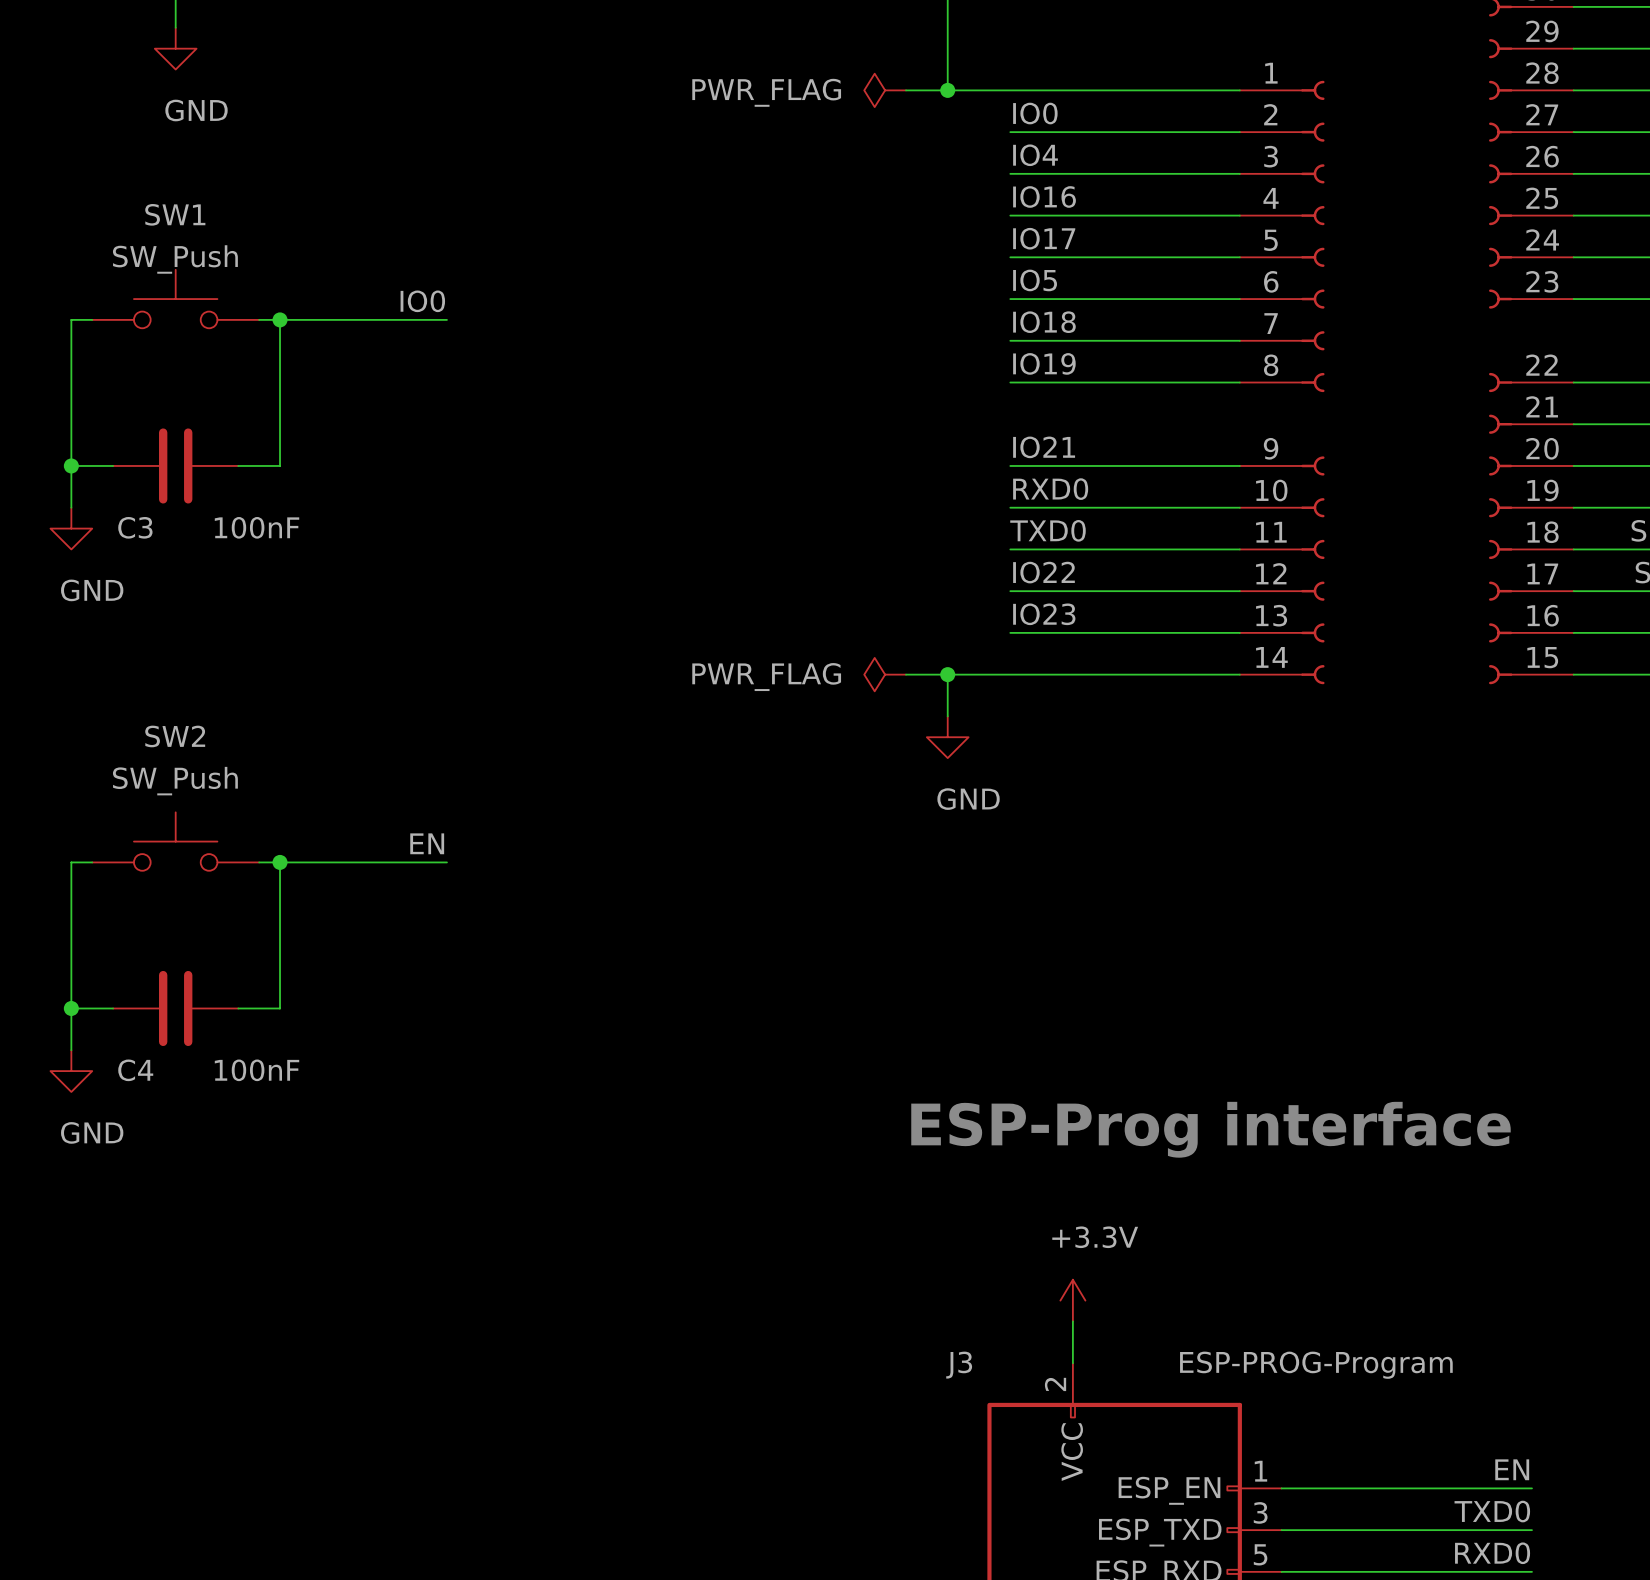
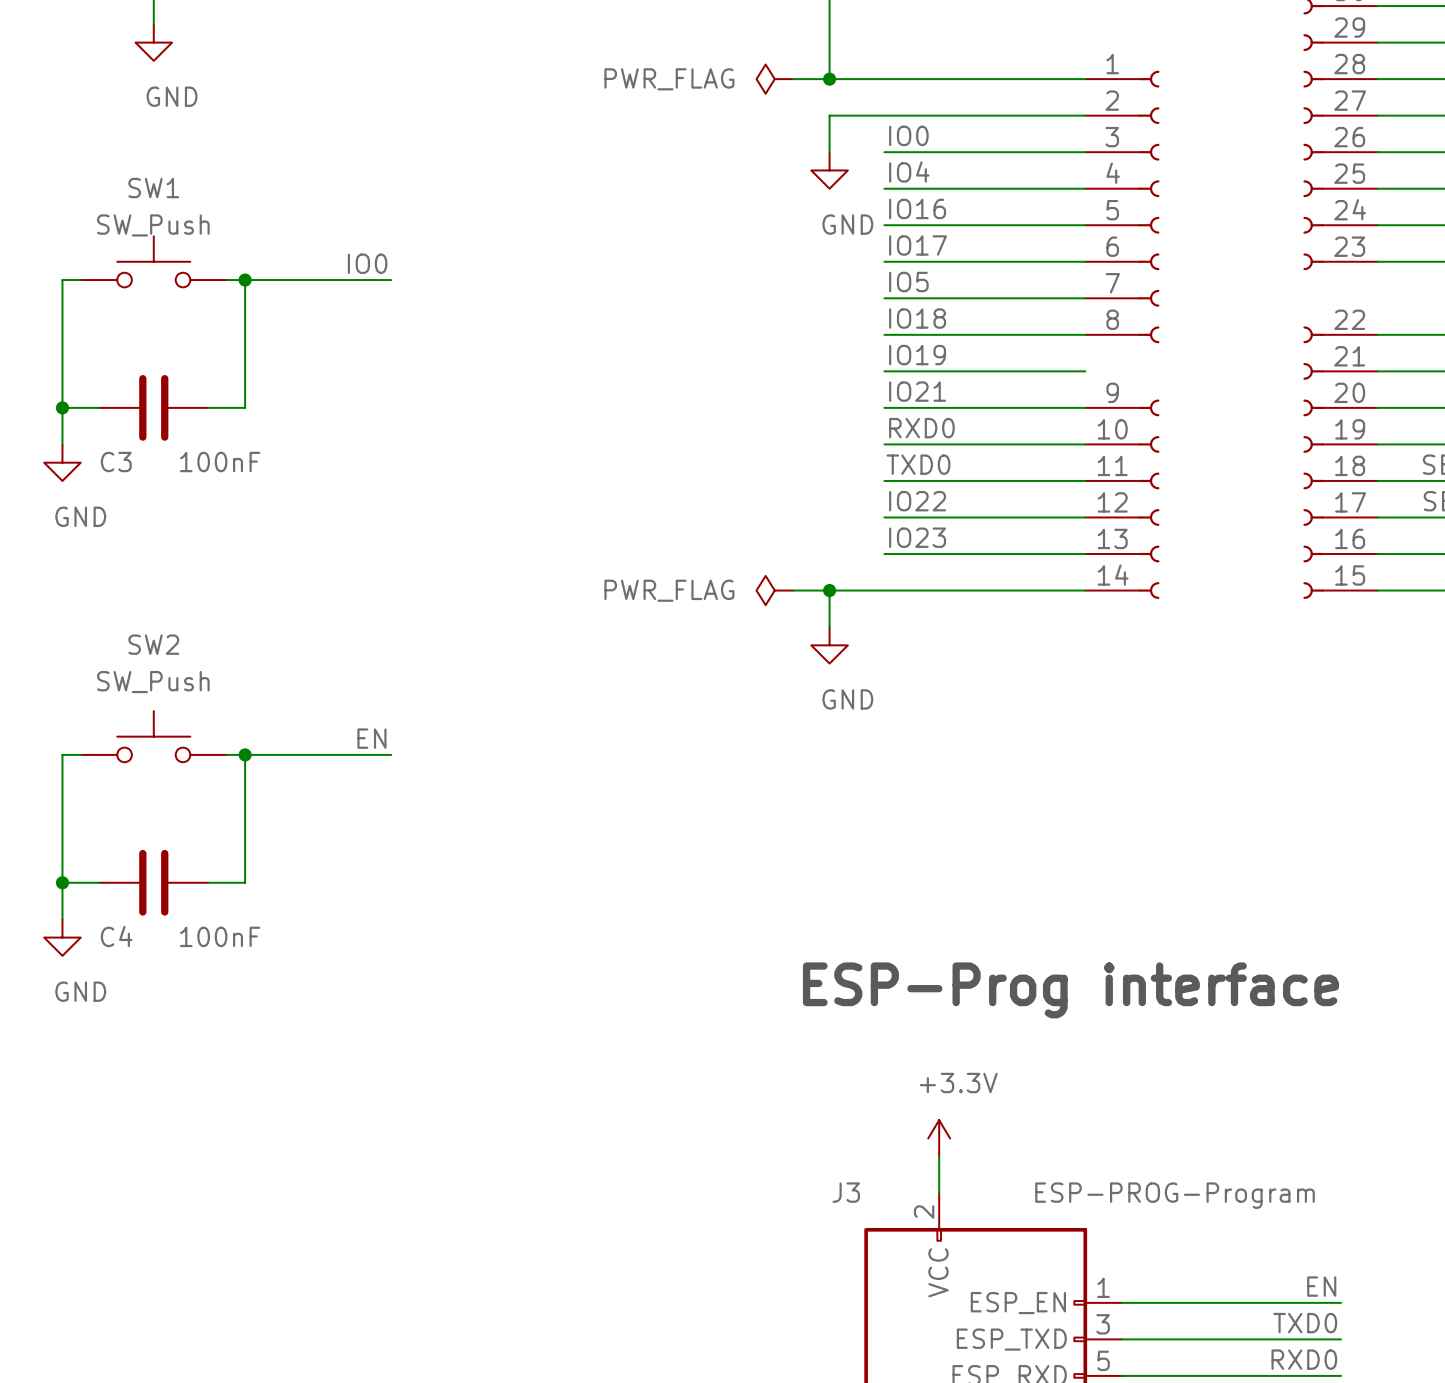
label: IO0 (1035, 113) -> none
wire: none -> (884, 115) (829, 115) (829, 152)
label: IO4 (1035, 155) -> IO0 (908, 135)
power symbol: none -> GND (829, 170)
label: IO16 (1044, 196) -> IO4 (909, 171)
label: IO17 (1044, 238) -> IO16 (917, 208)
label: IO5 (1035, 280) -> IO17 (918, 245)
label: IO18 (1044, 322) -> IO5 (908, 282)
label: IO19 (1044, 363) -> IO18 (917, 318)
label: none -> IO19 (917, 355)
wire: none -> (884, 371) (1085, 371)

